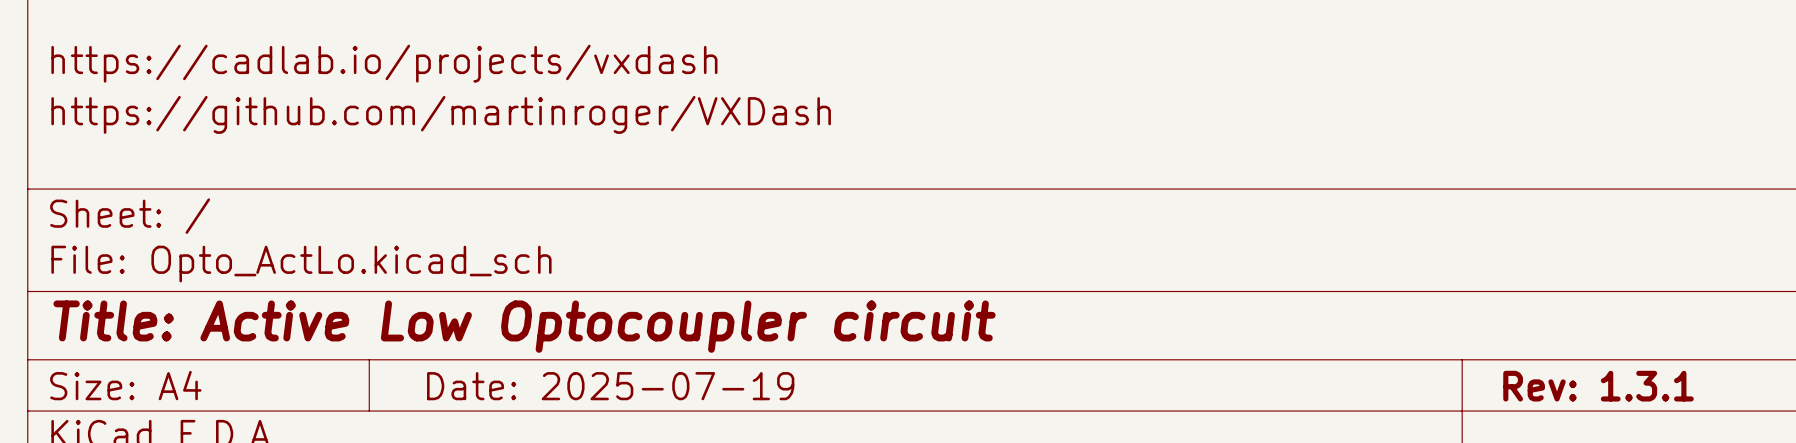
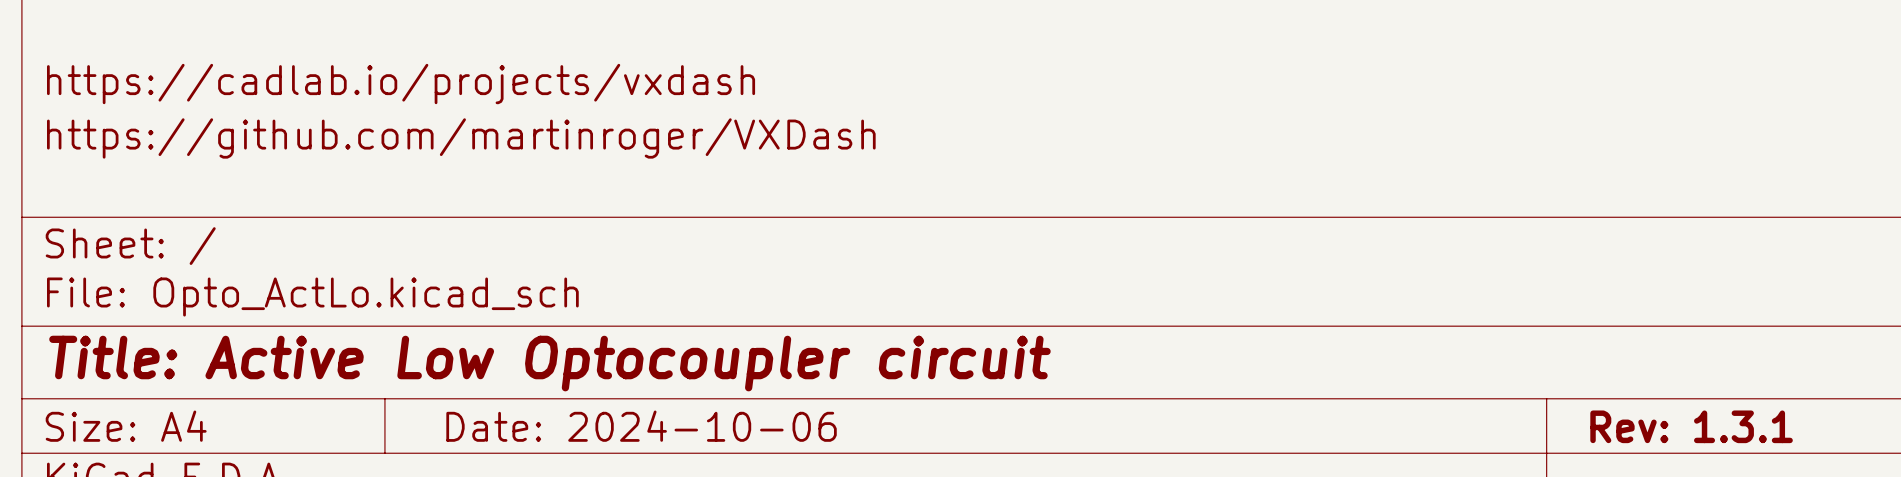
title block: Date: 2025-07-19 (610, 386) -> Date: 2024-10-06 (641, 426)

